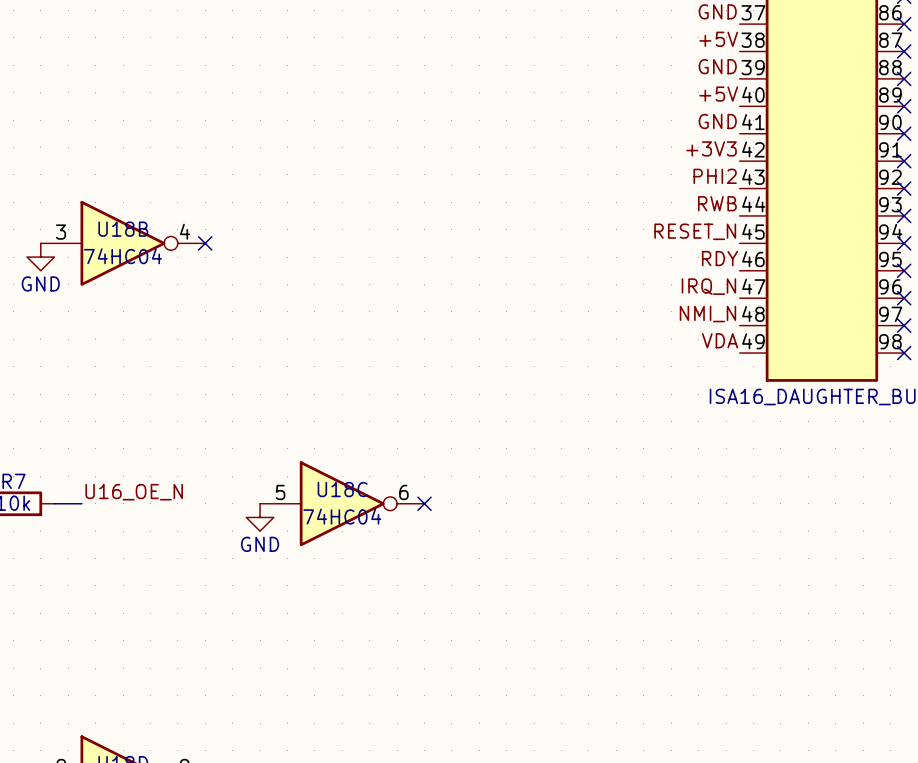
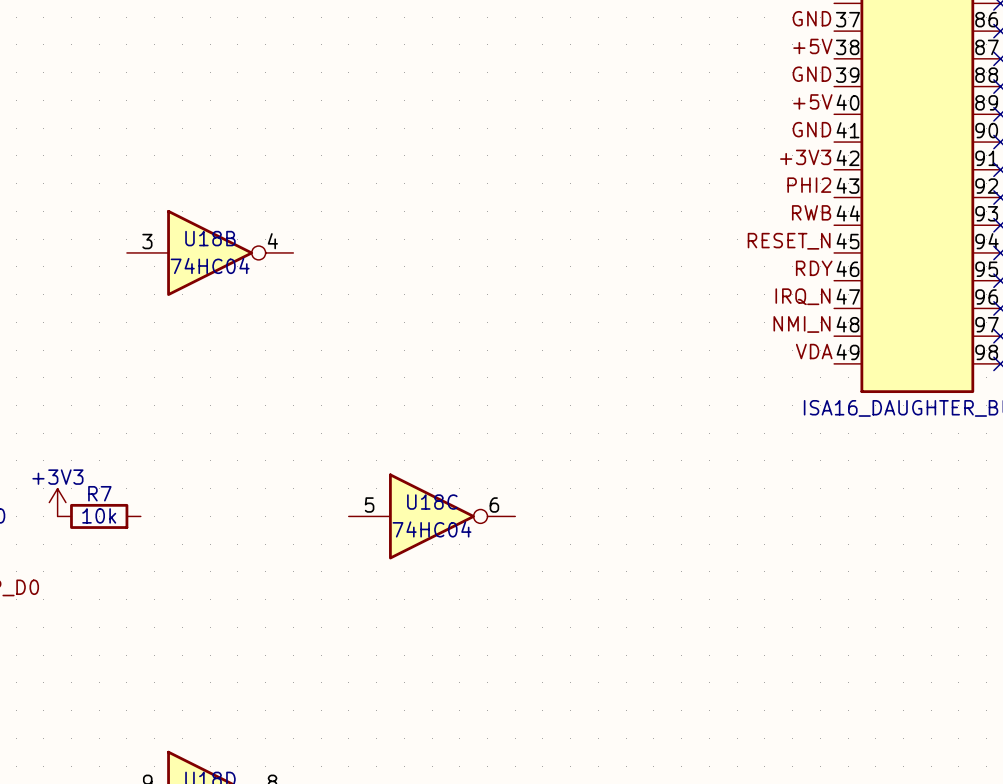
no-connect mark: (205, 243) -> none
power symbol: GND (40, 257) -> none
label: U16_OE_N (134, 492) -> none
wire: (54, 503) (81, 503) -> none
no-connect mark: (424, 503) -> none
power symbol: GND (260, 517) -> none

